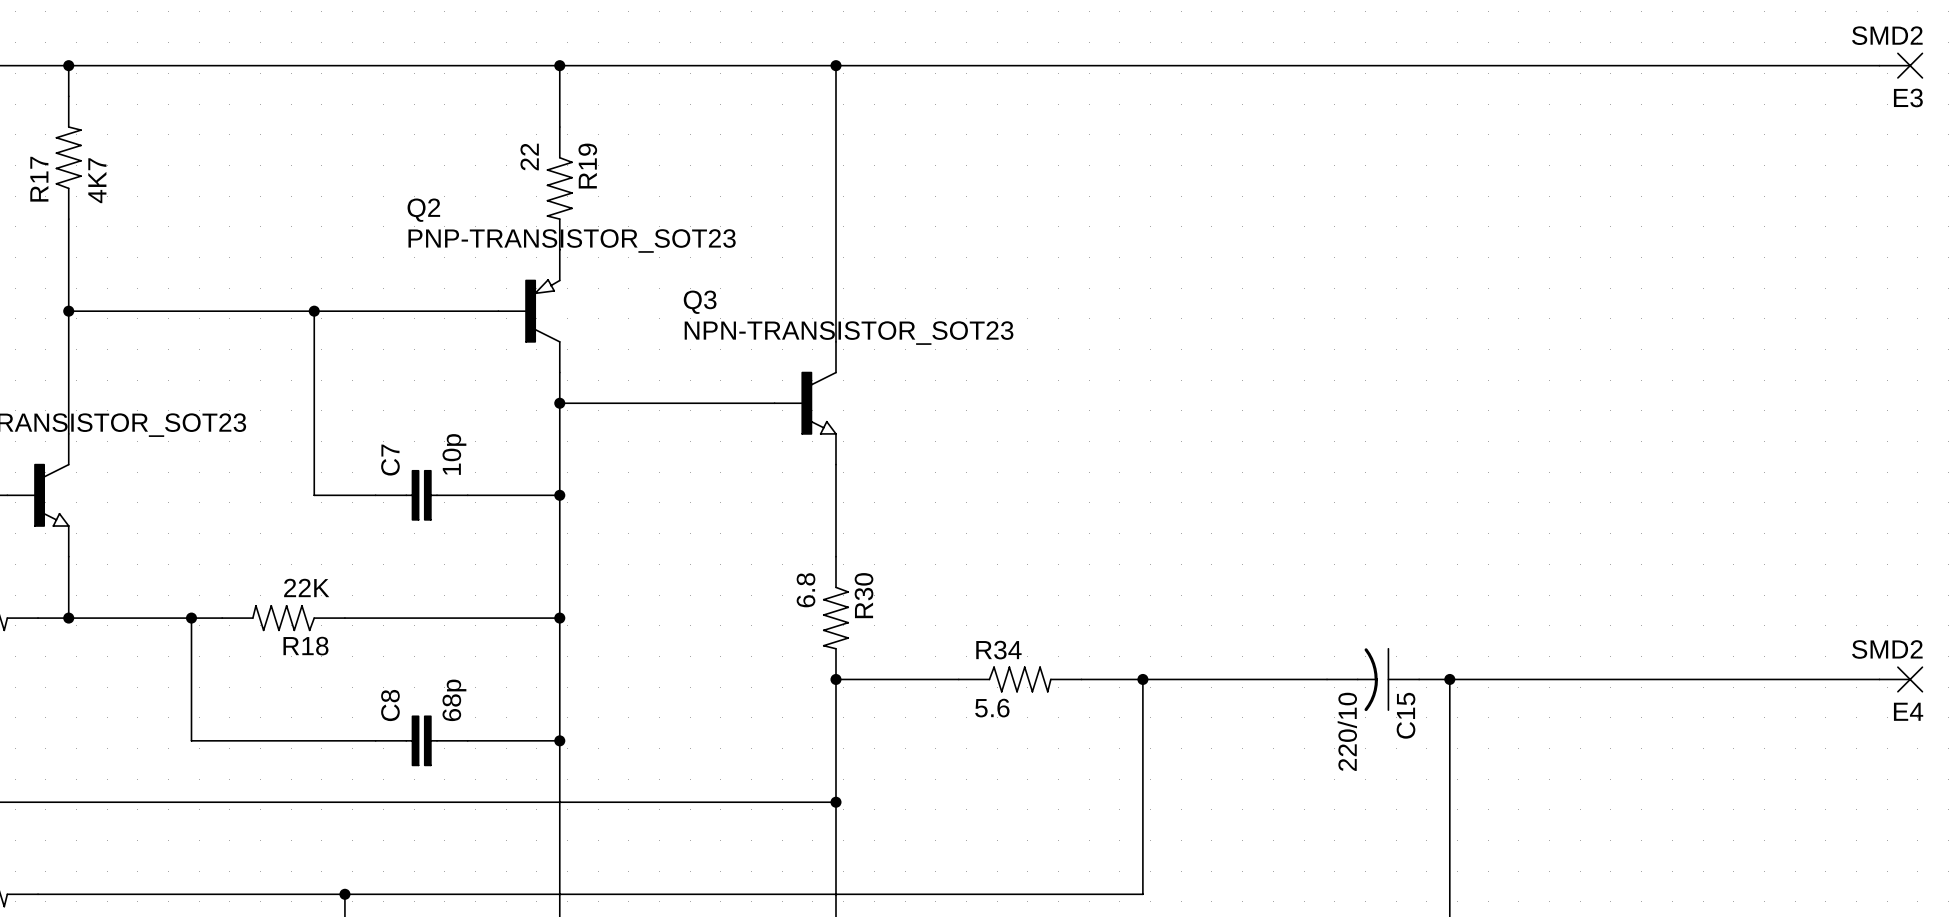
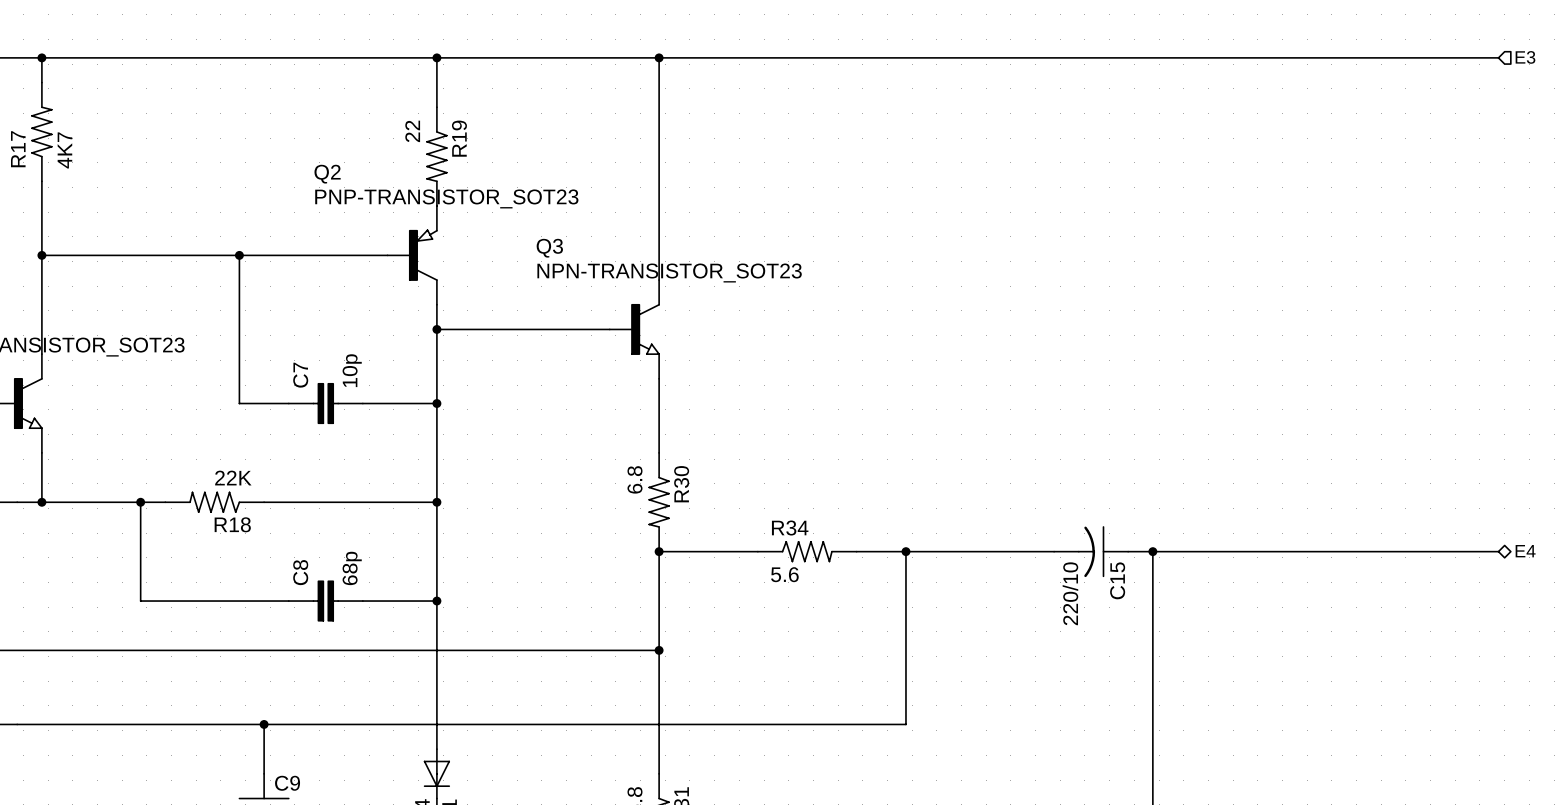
E3: SMD2 (1900, 65) -> none
hierarchical label: none -> E3 (1525, 57)
hierarchical label: none -> E4 (1525, 551)
E4: SMD2 (1900, 679) -> none

